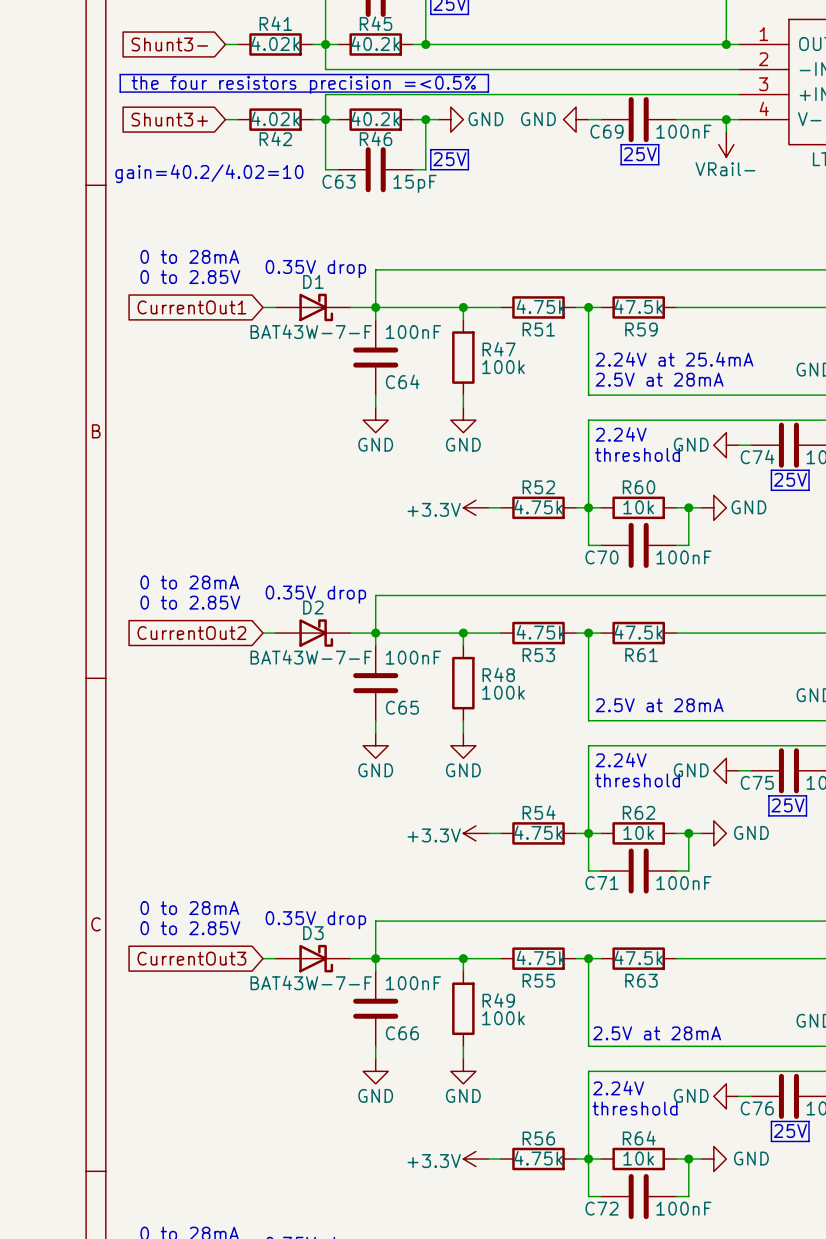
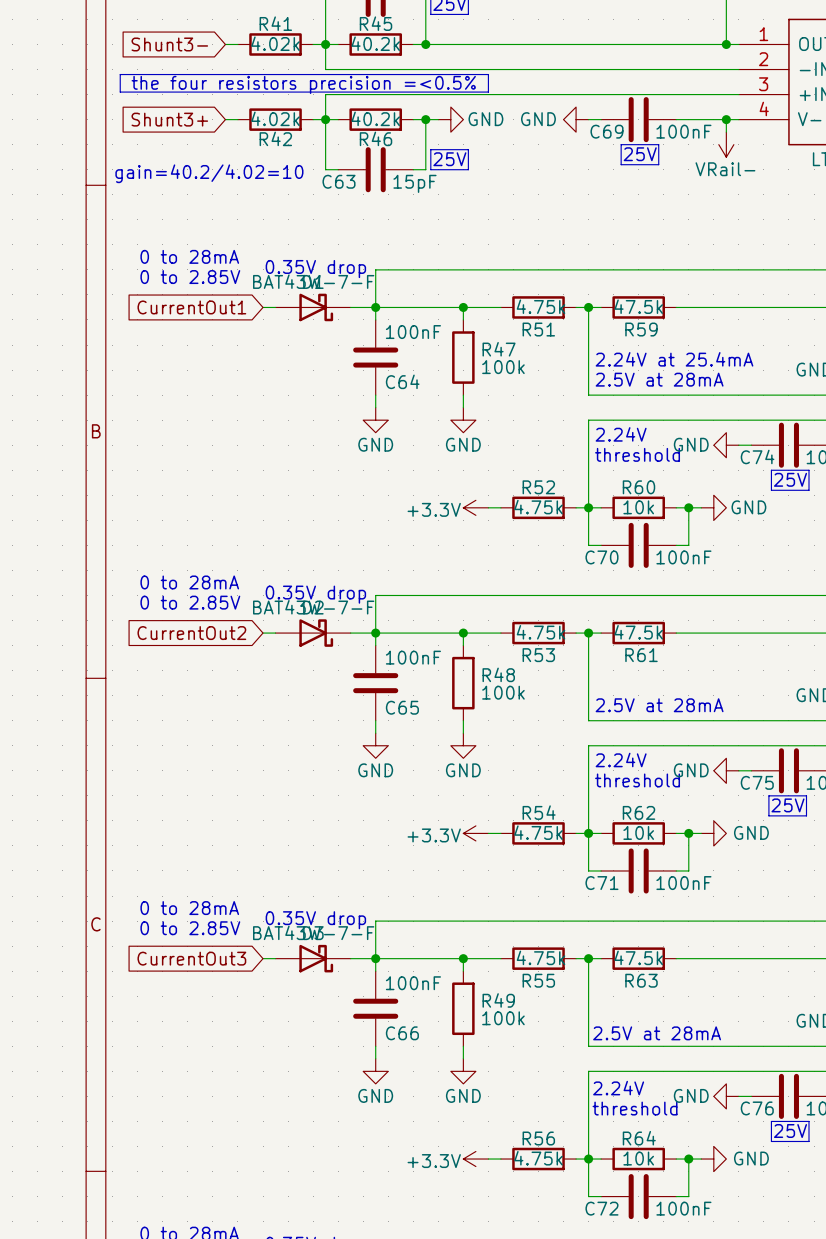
D1 value position: BAT43W-7-F (311, 331) -> BAT43W-7-F (313, 281)
D2 value position: BAT43W-7-F (311, 657) -> BAT43W-7-F (313, 607)
D3 value position: BAT43W-7-F (311, 982) -> BAT43W-7-F (313, 932)

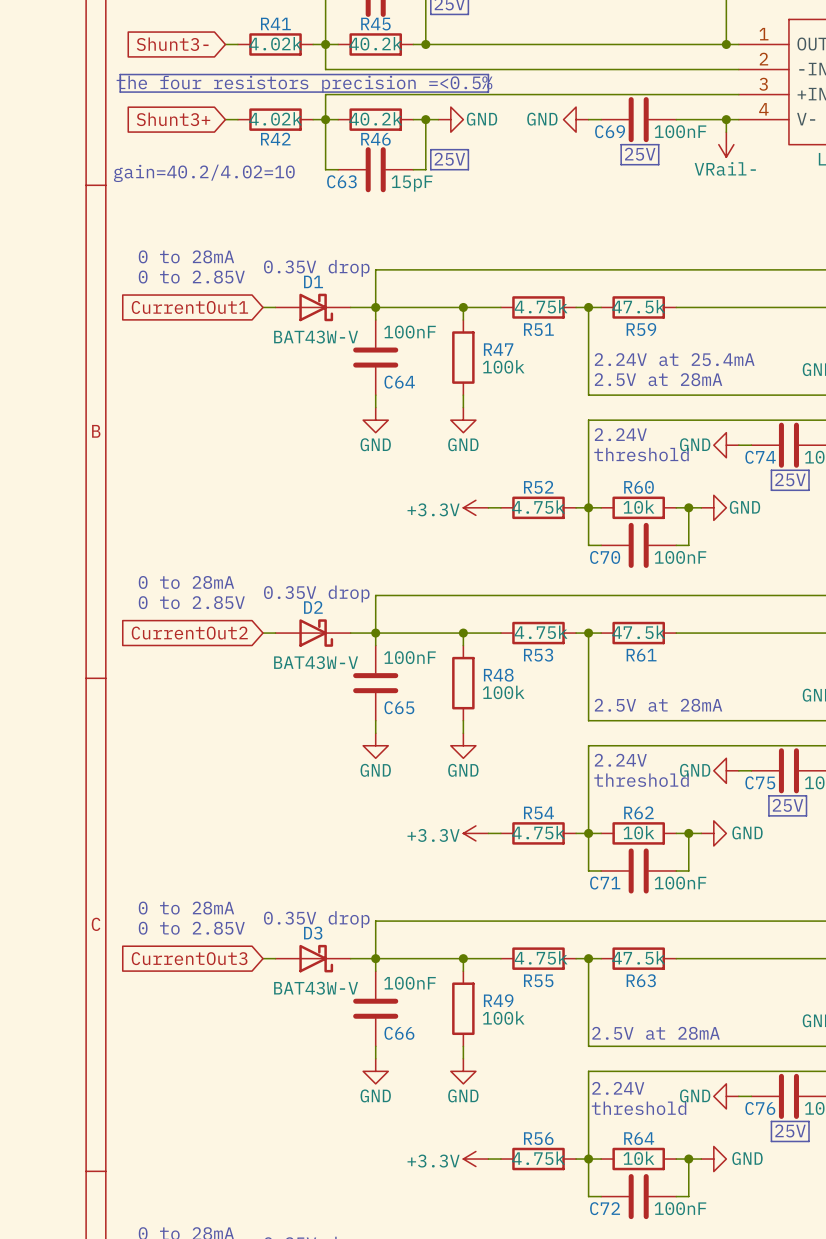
D1 value: BAT43W-7-F (313, 281) -> BAT43W-V (316, 337)
D2 value: BAT43W-7-F (313, 607) -> BAT43W-V (316, 662)
D3 value: BAT43W-7-F (313, 932) -> BAT43W-V (316, 988)

